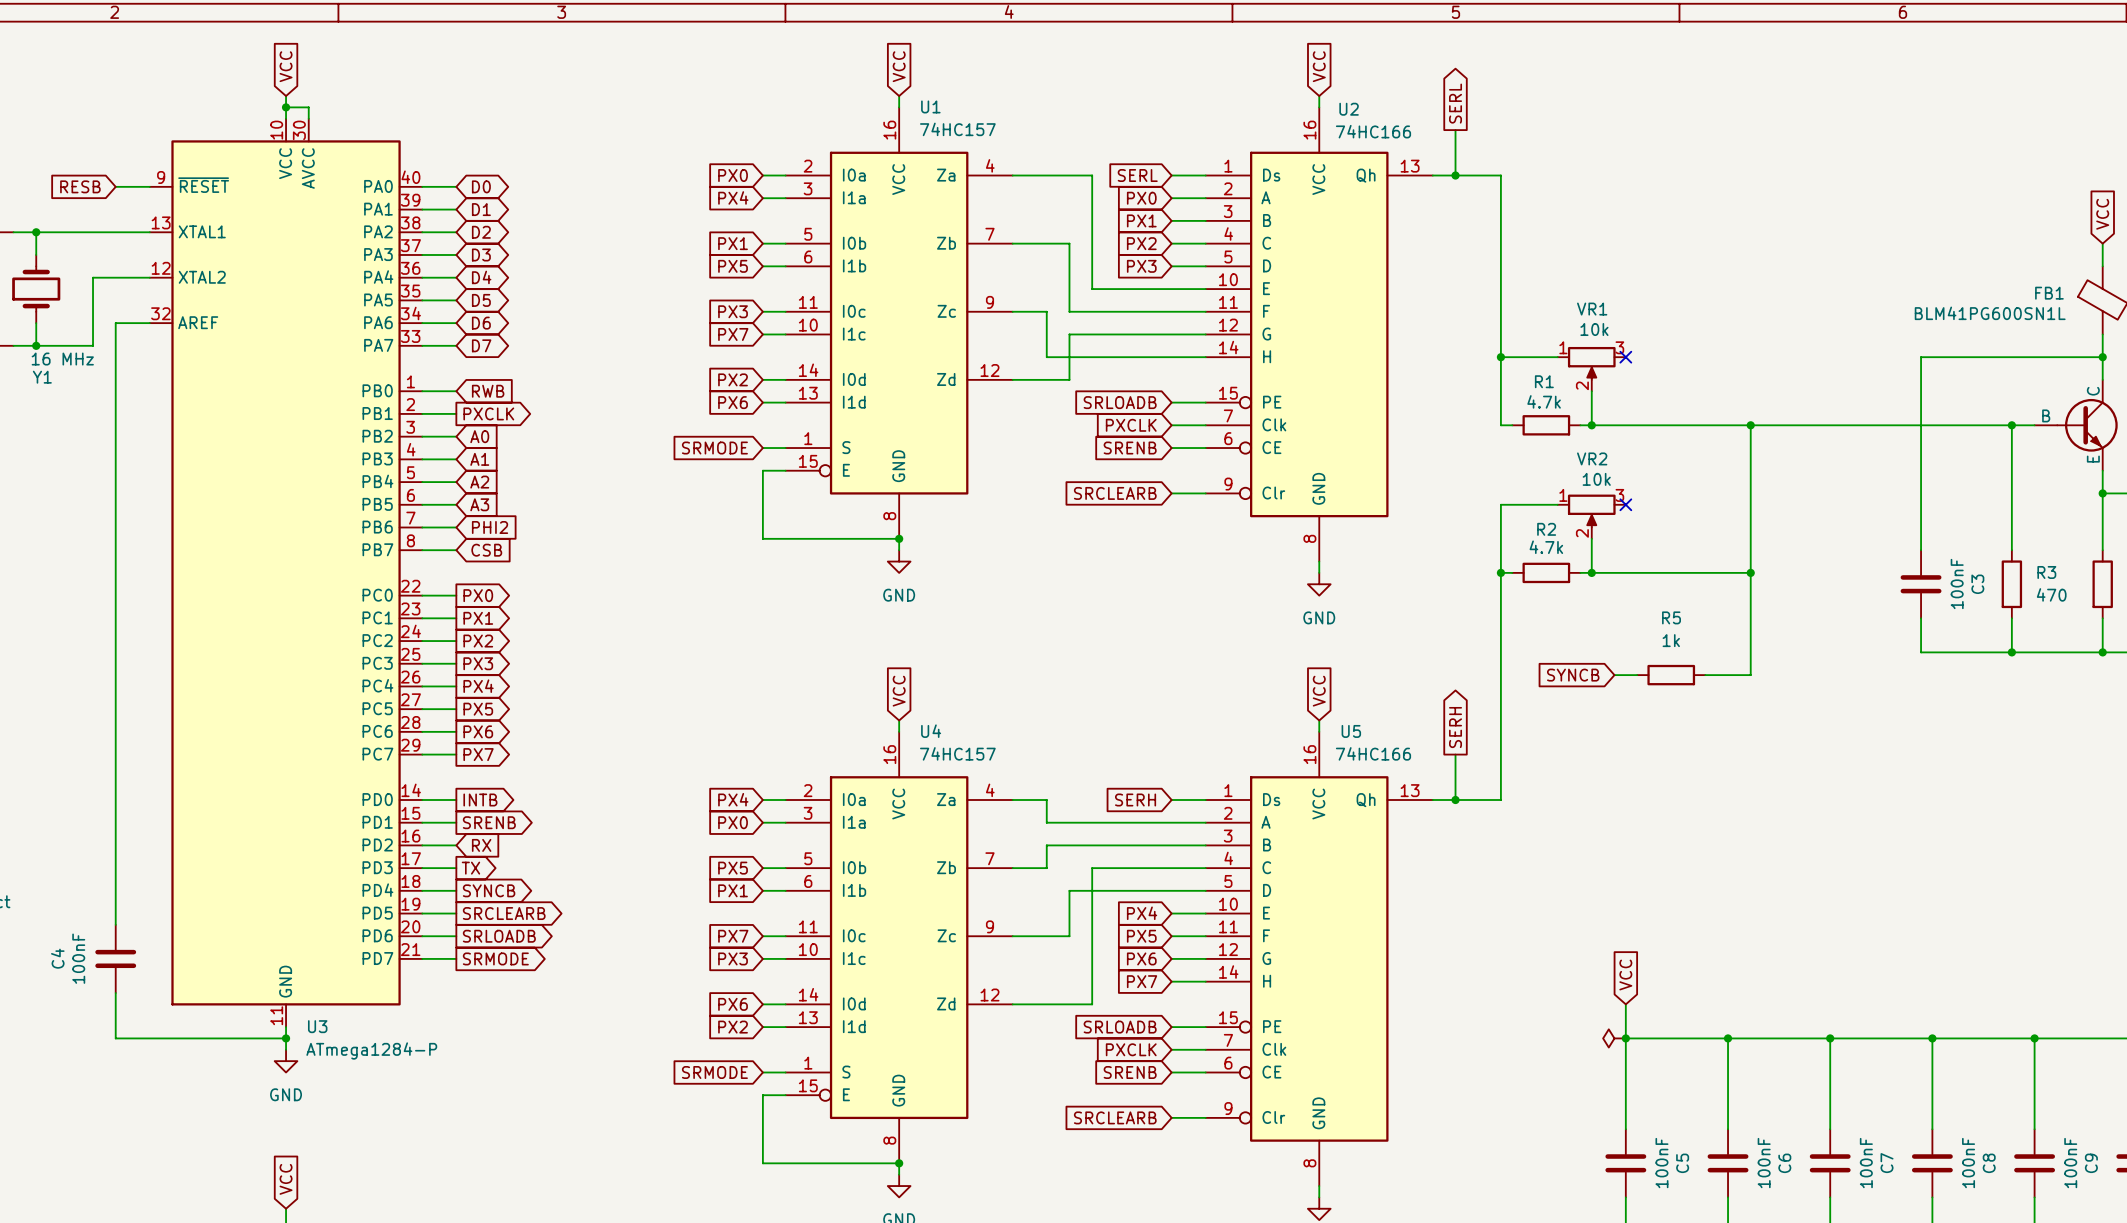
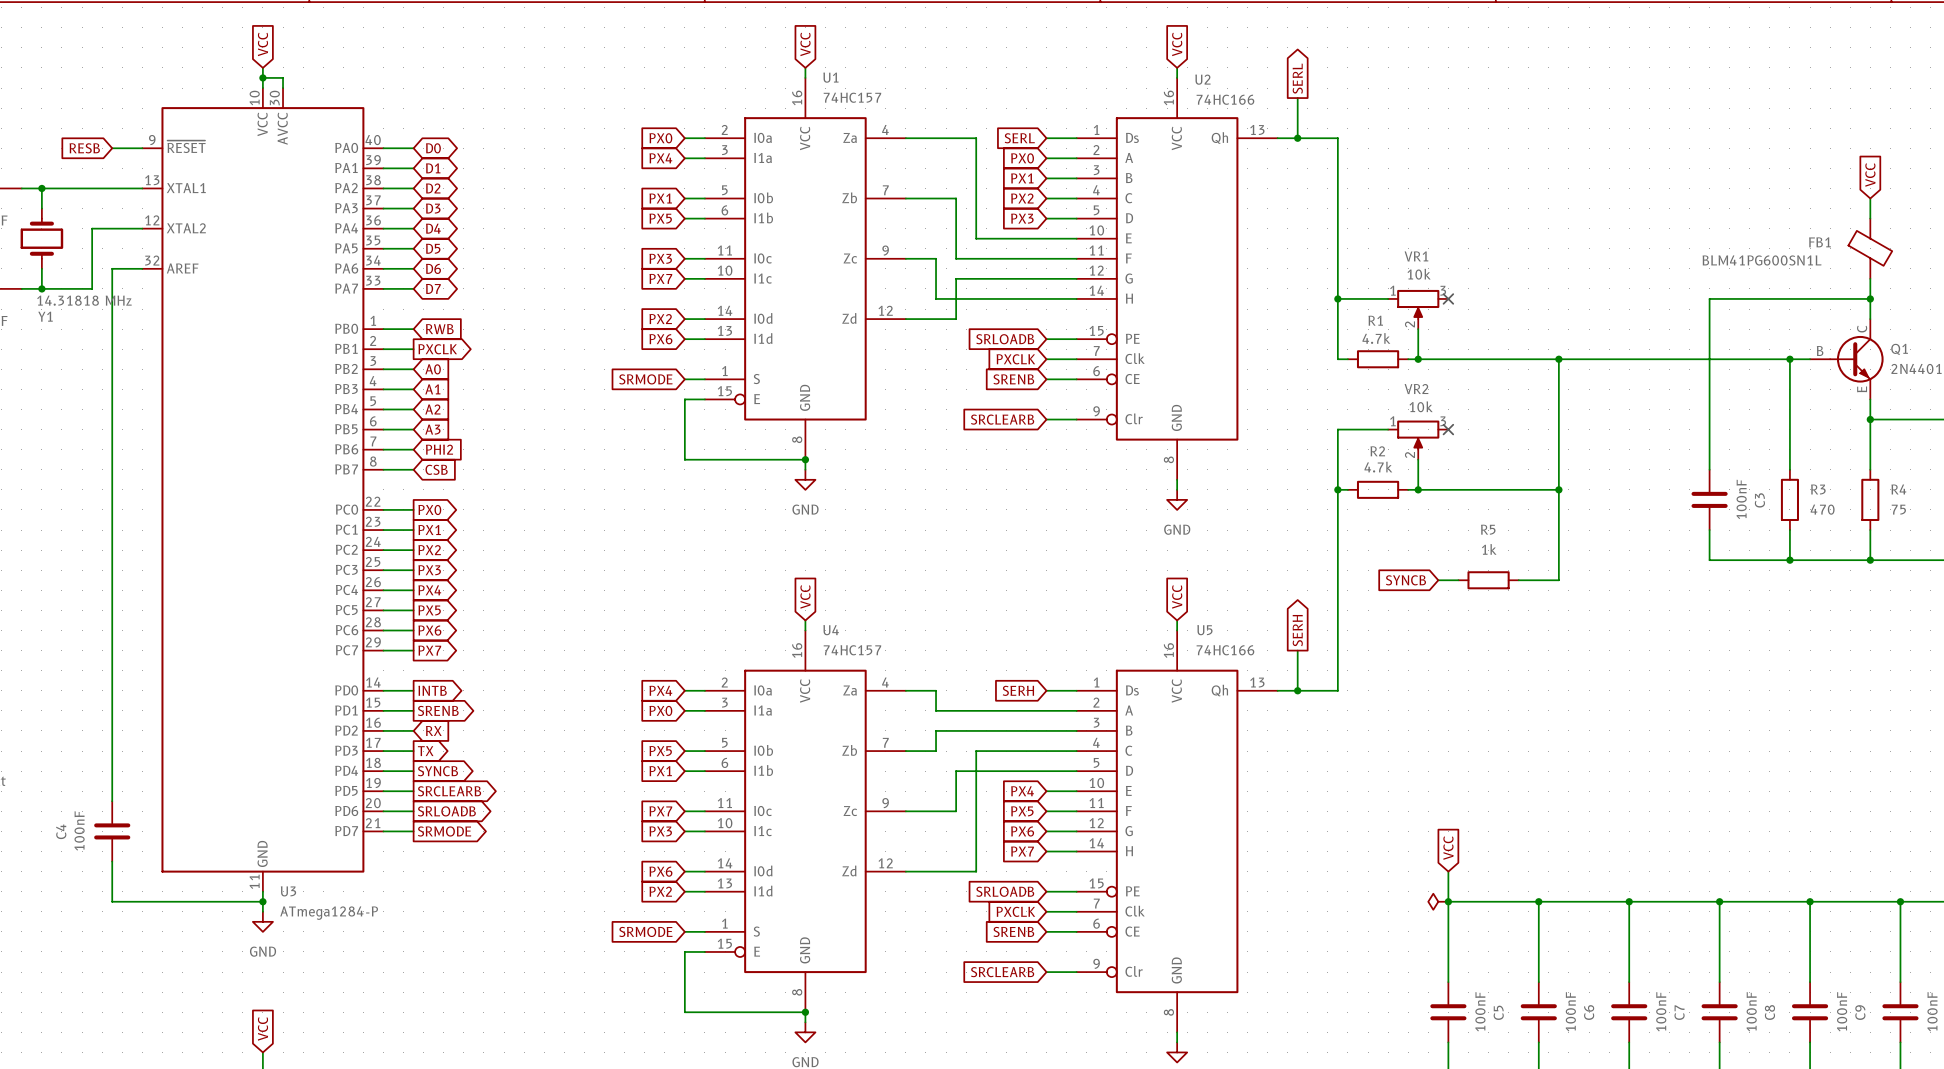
Y1 value: 16 MHz (62, 359) -> 14.31818 MHz (84, 300)

